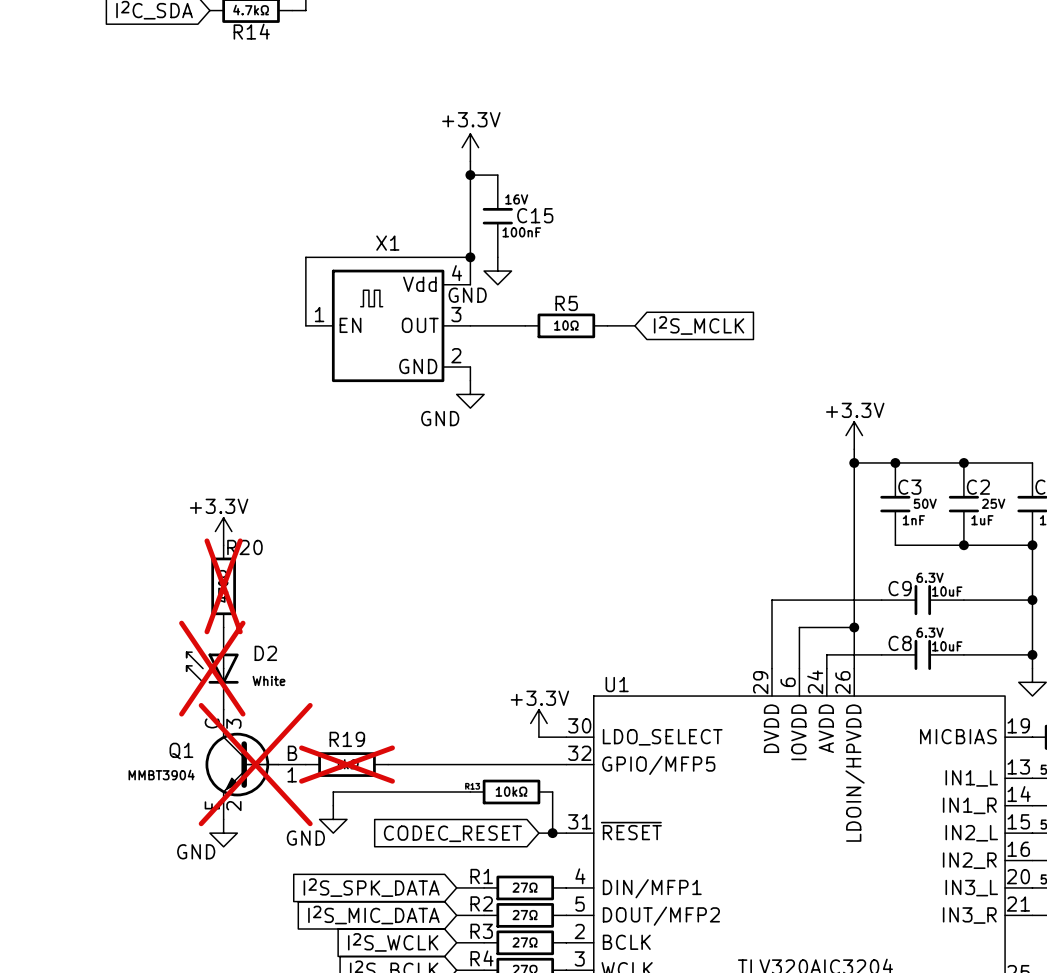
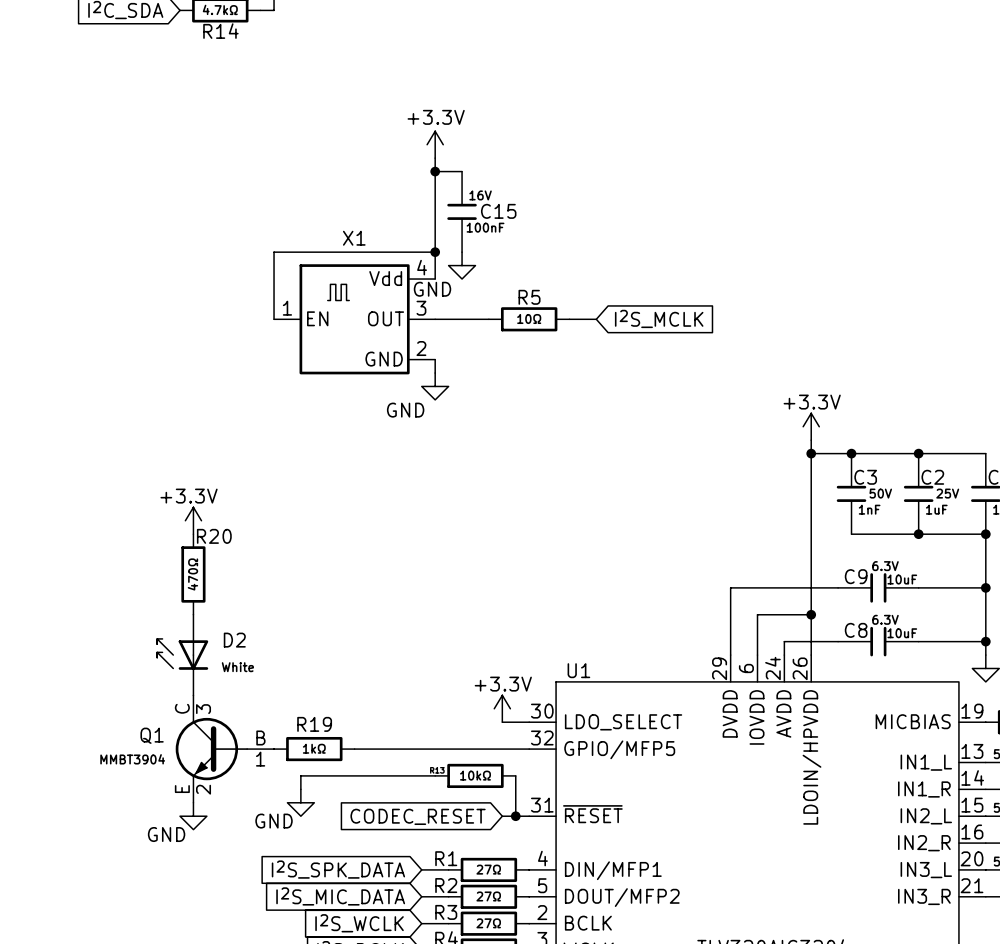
R20 do-not-place cross: (223, 586) -> none
D2 do-not-place cross: (212, 668) -> none
Q1 do-not-place cross: (255, 764) -> none
R19 do-not-place cross: (347, 764) -> none

